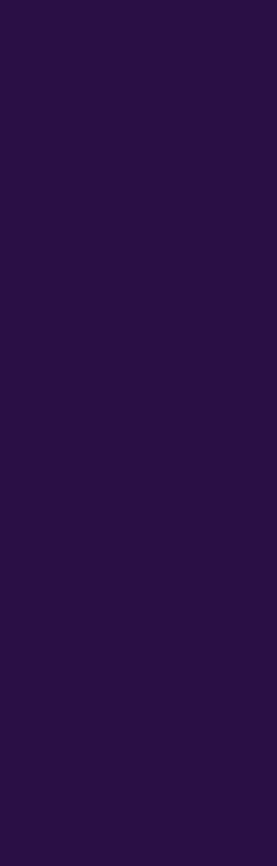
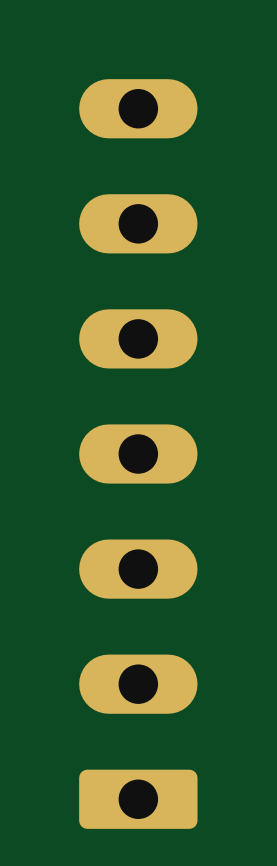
part: none -> (138, 454)

